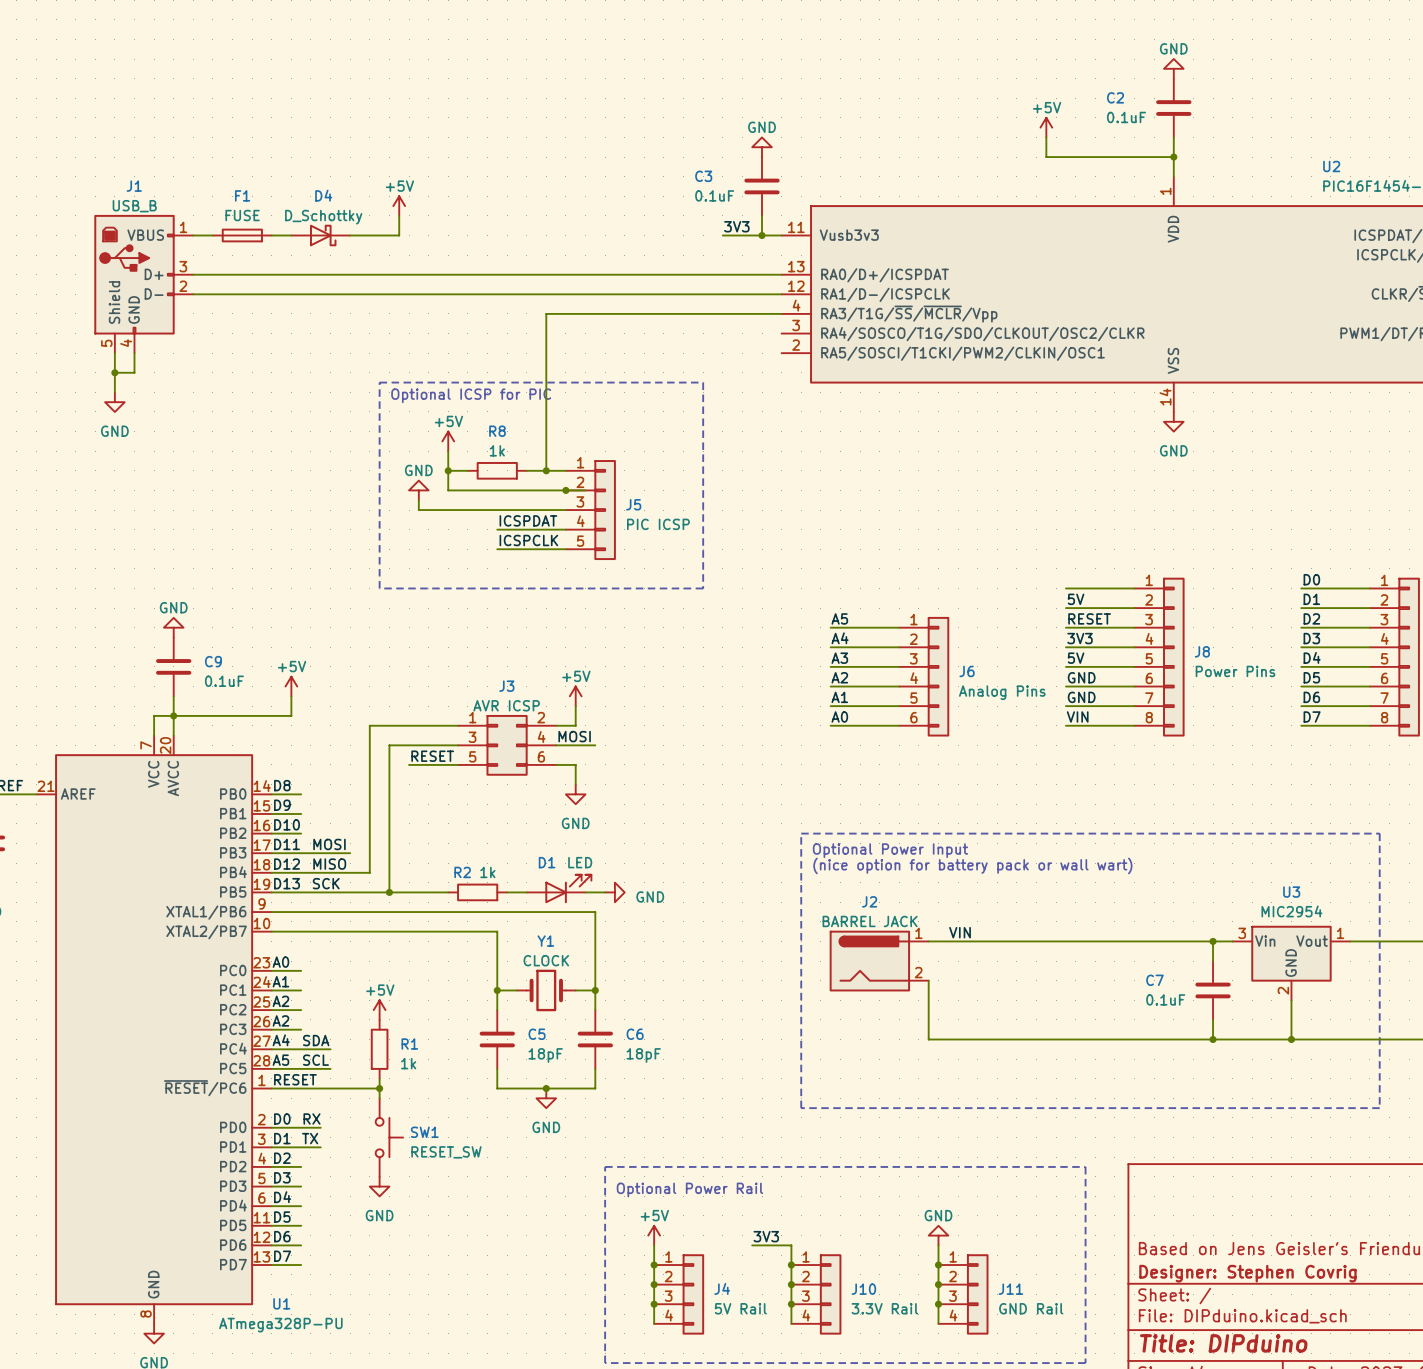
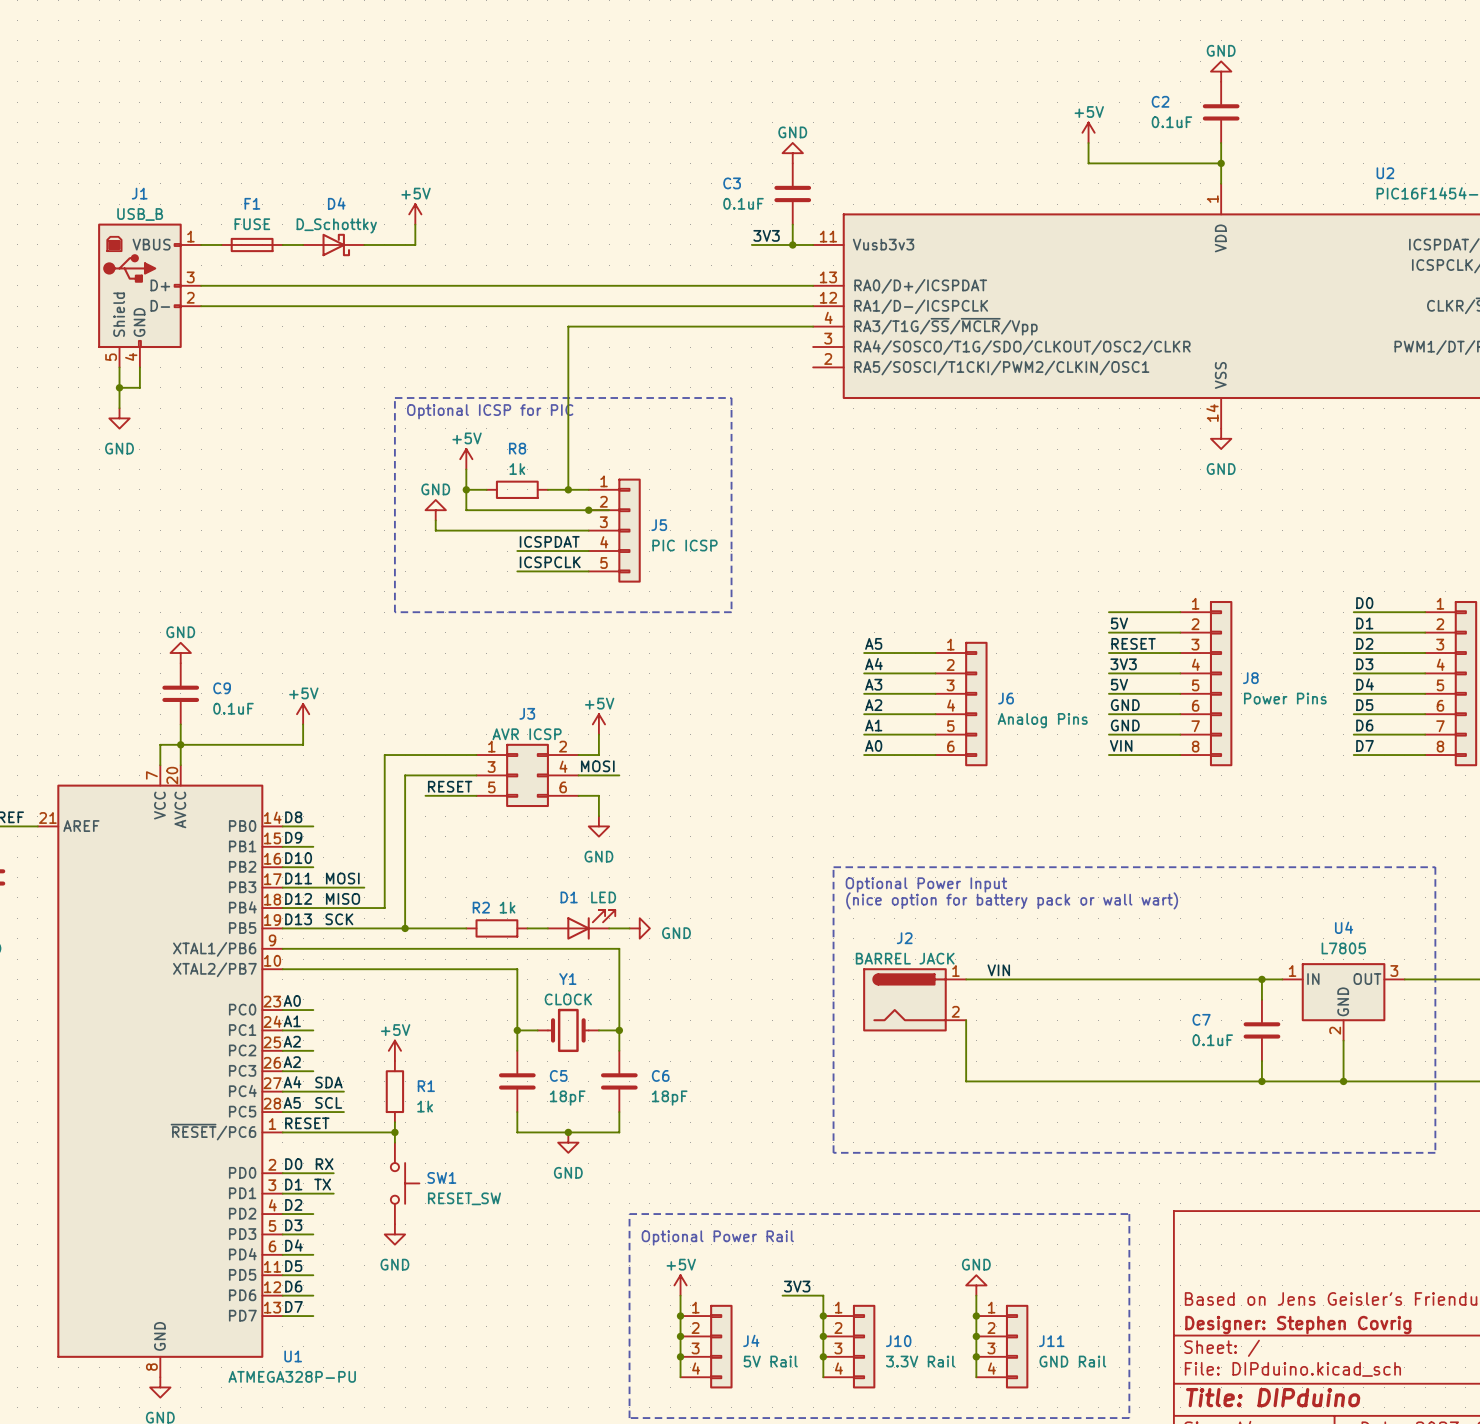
U3 name: U3 (1291, 892) -> U4 (1344, 927)
U3 value: MIC2954 (1291, 911) -> L7805 (1343, 948)
U3 pin number: 3 (1242, 933) -> 1 (1292, 971)
U3 pin number: 1 (1340, 933) -> 3 (1394, 971)
U3 pin name: Vin (1265, 941) -> IN (1313, 979)
U3 pin name: Vout (1312, 941) -> OUT (1367, 979)
U1 value: ATmega328P-PU (280, 1325) -> ATMEGA328P-PU (292, 1376)

